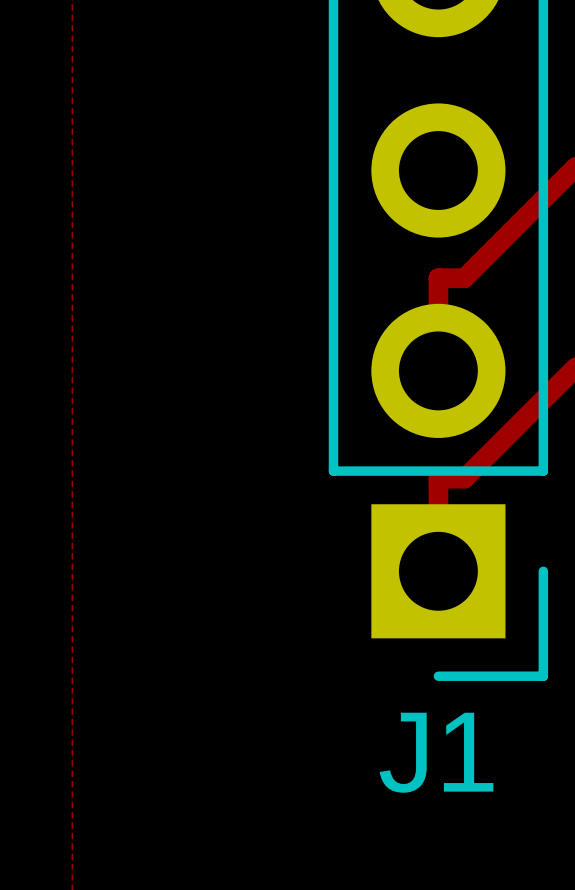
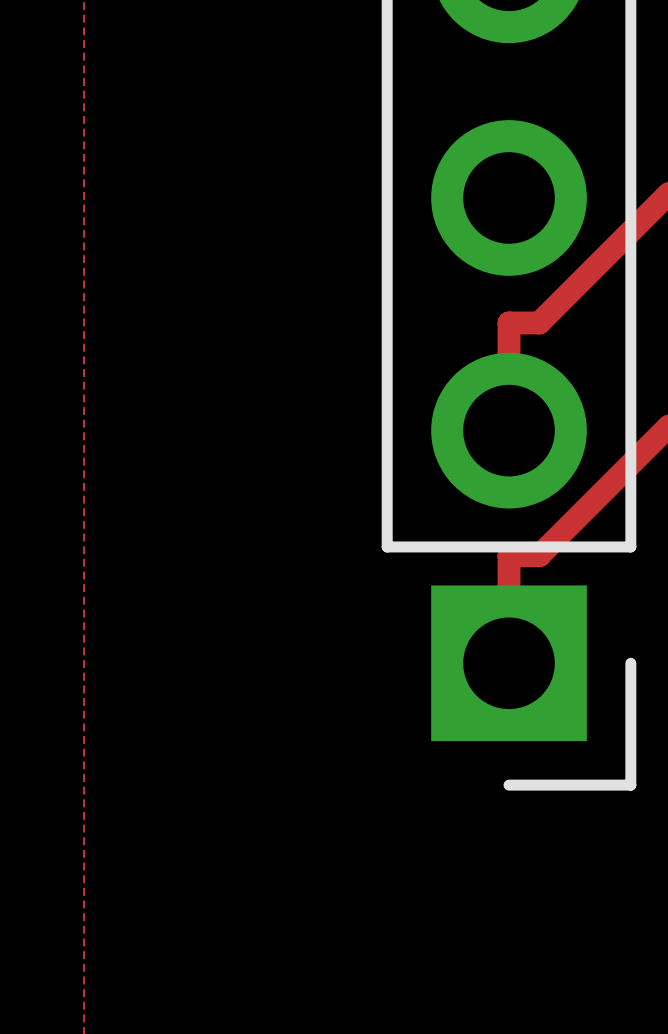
J1 name: J1 (436, 752) -> none

